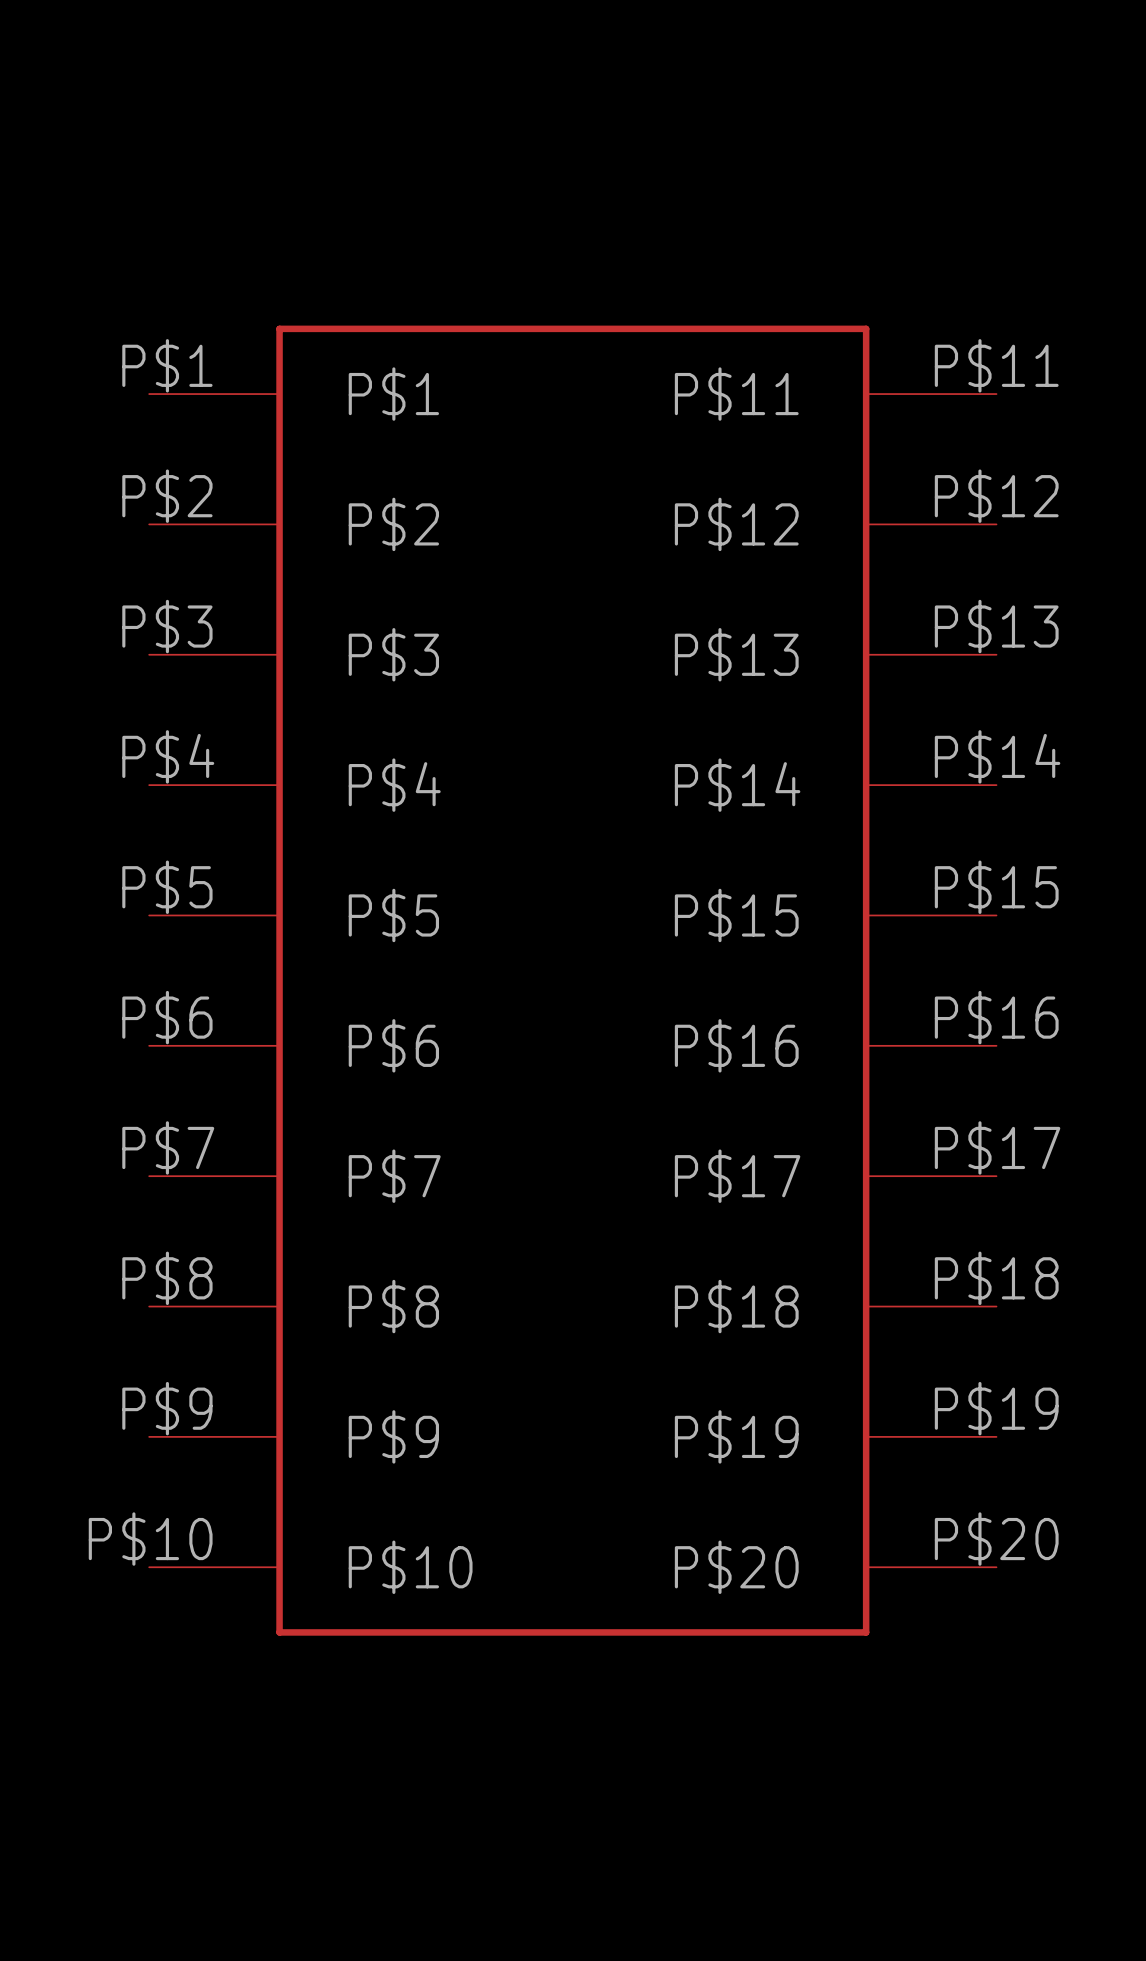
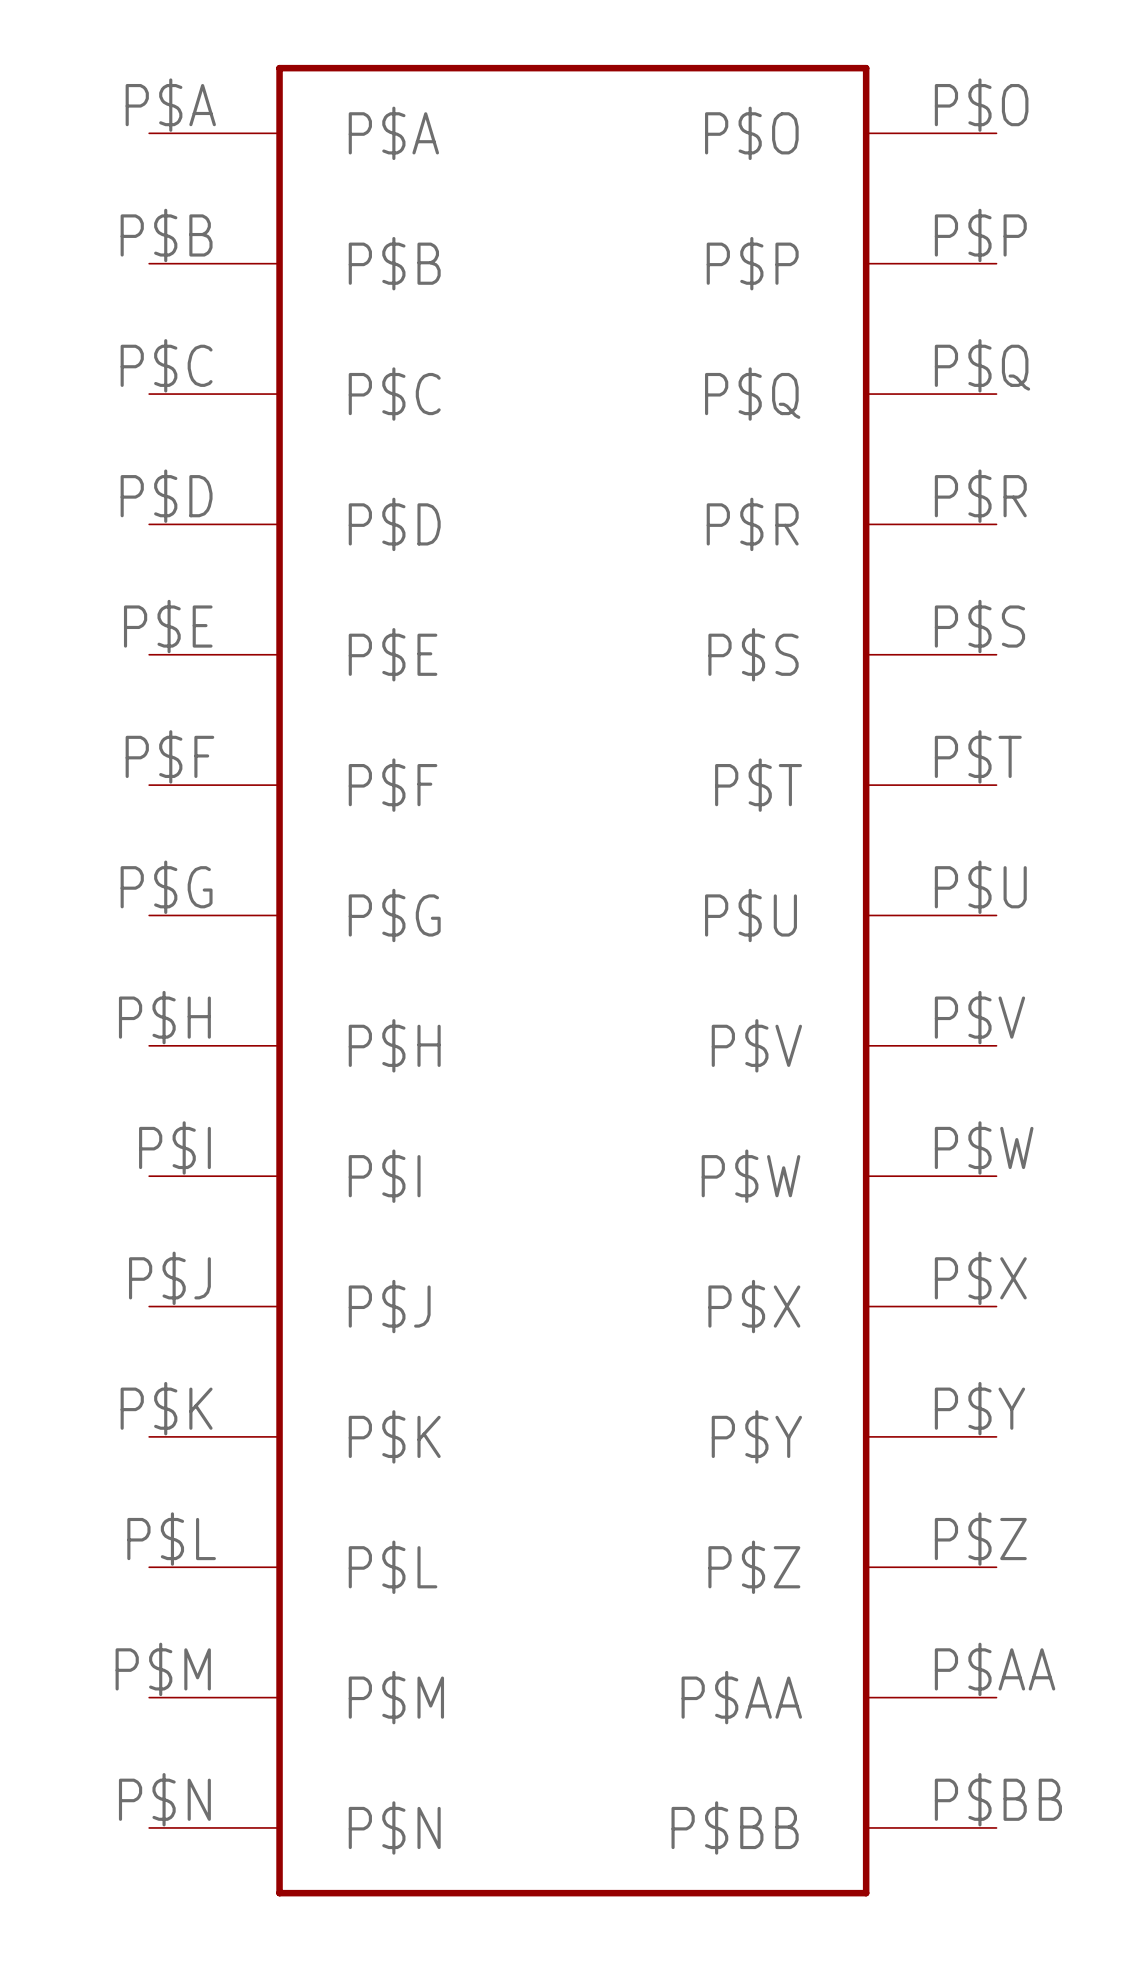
part symbol: [149, 325, 997, 1636] -> [149, 64, 997, 1897]

